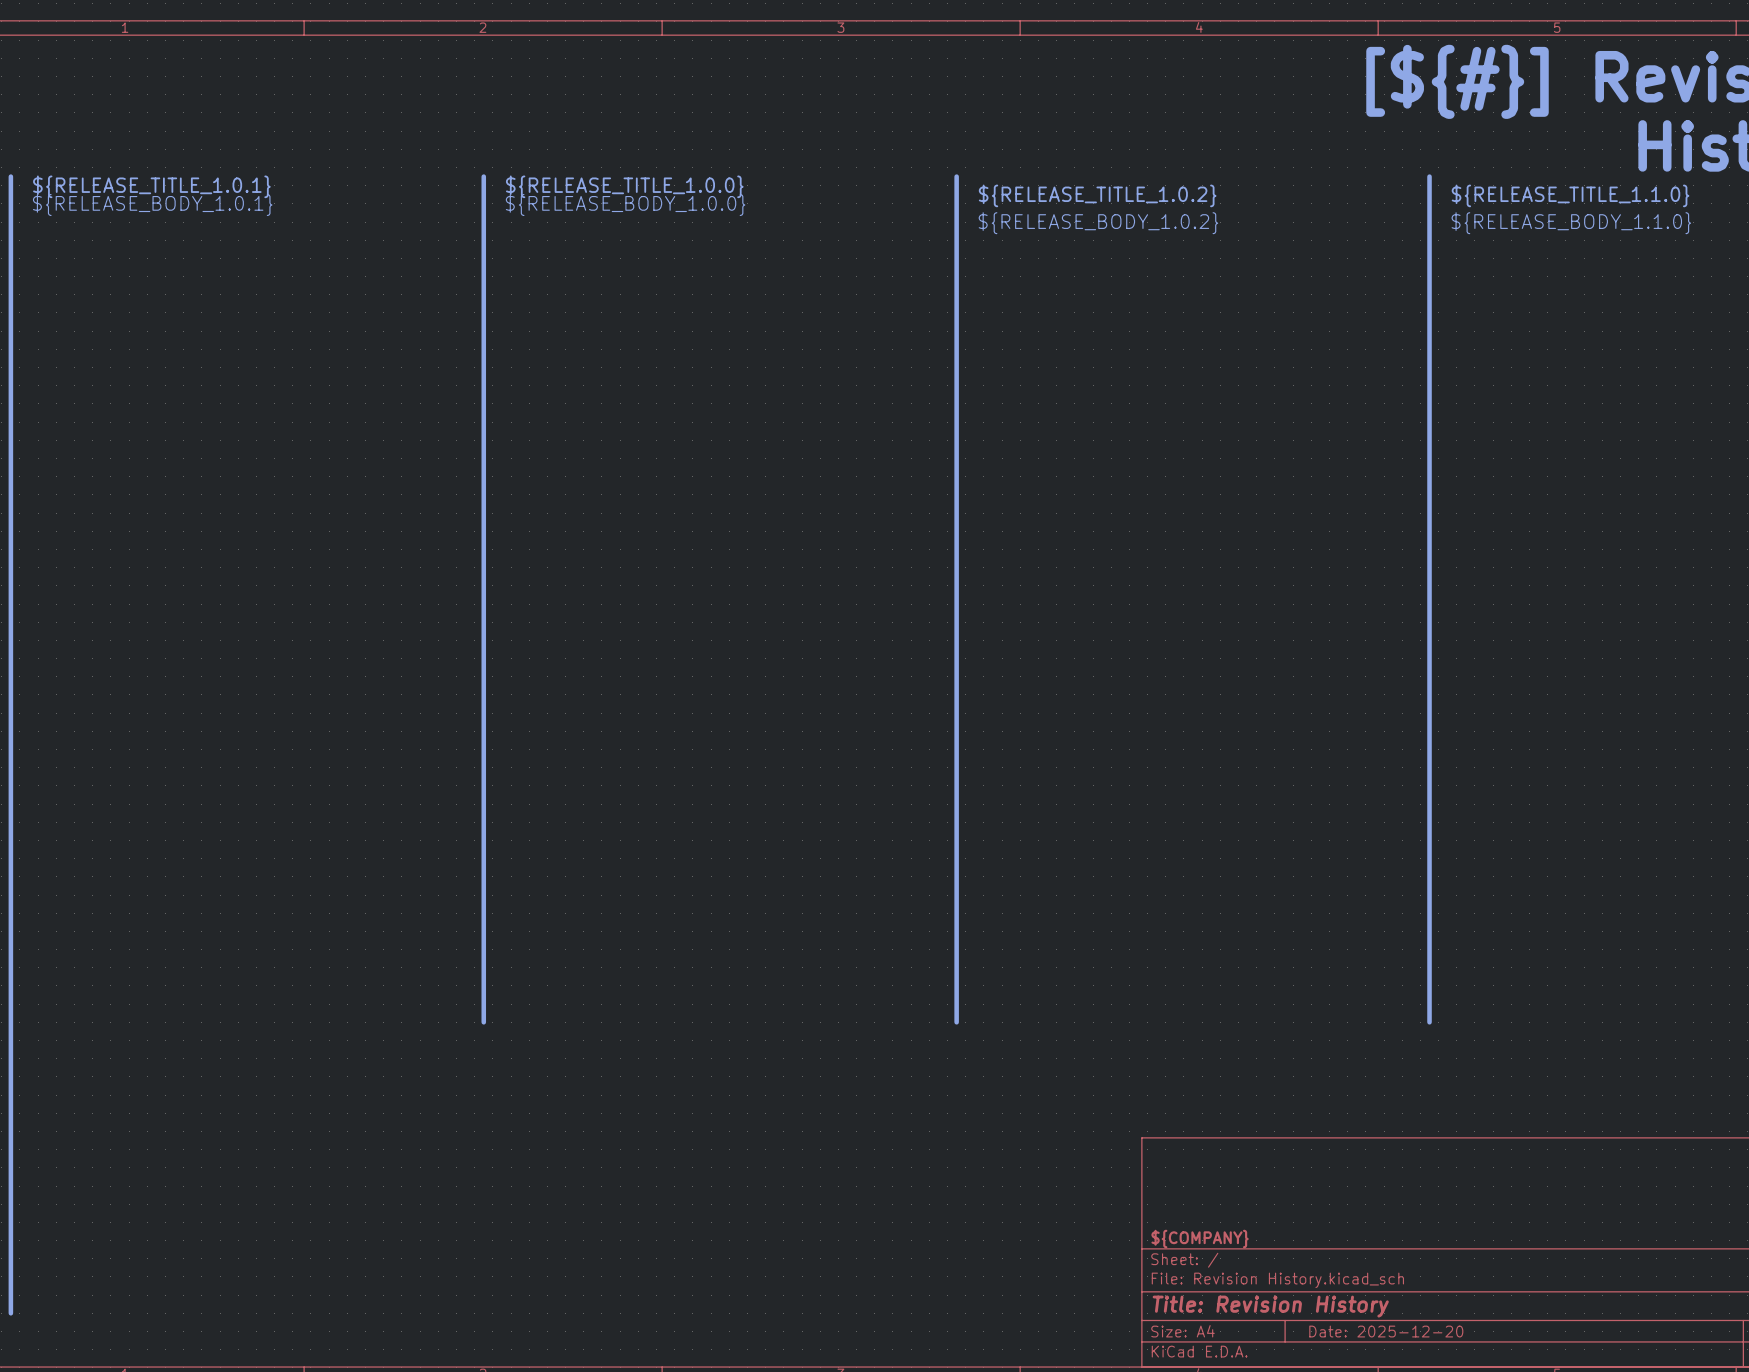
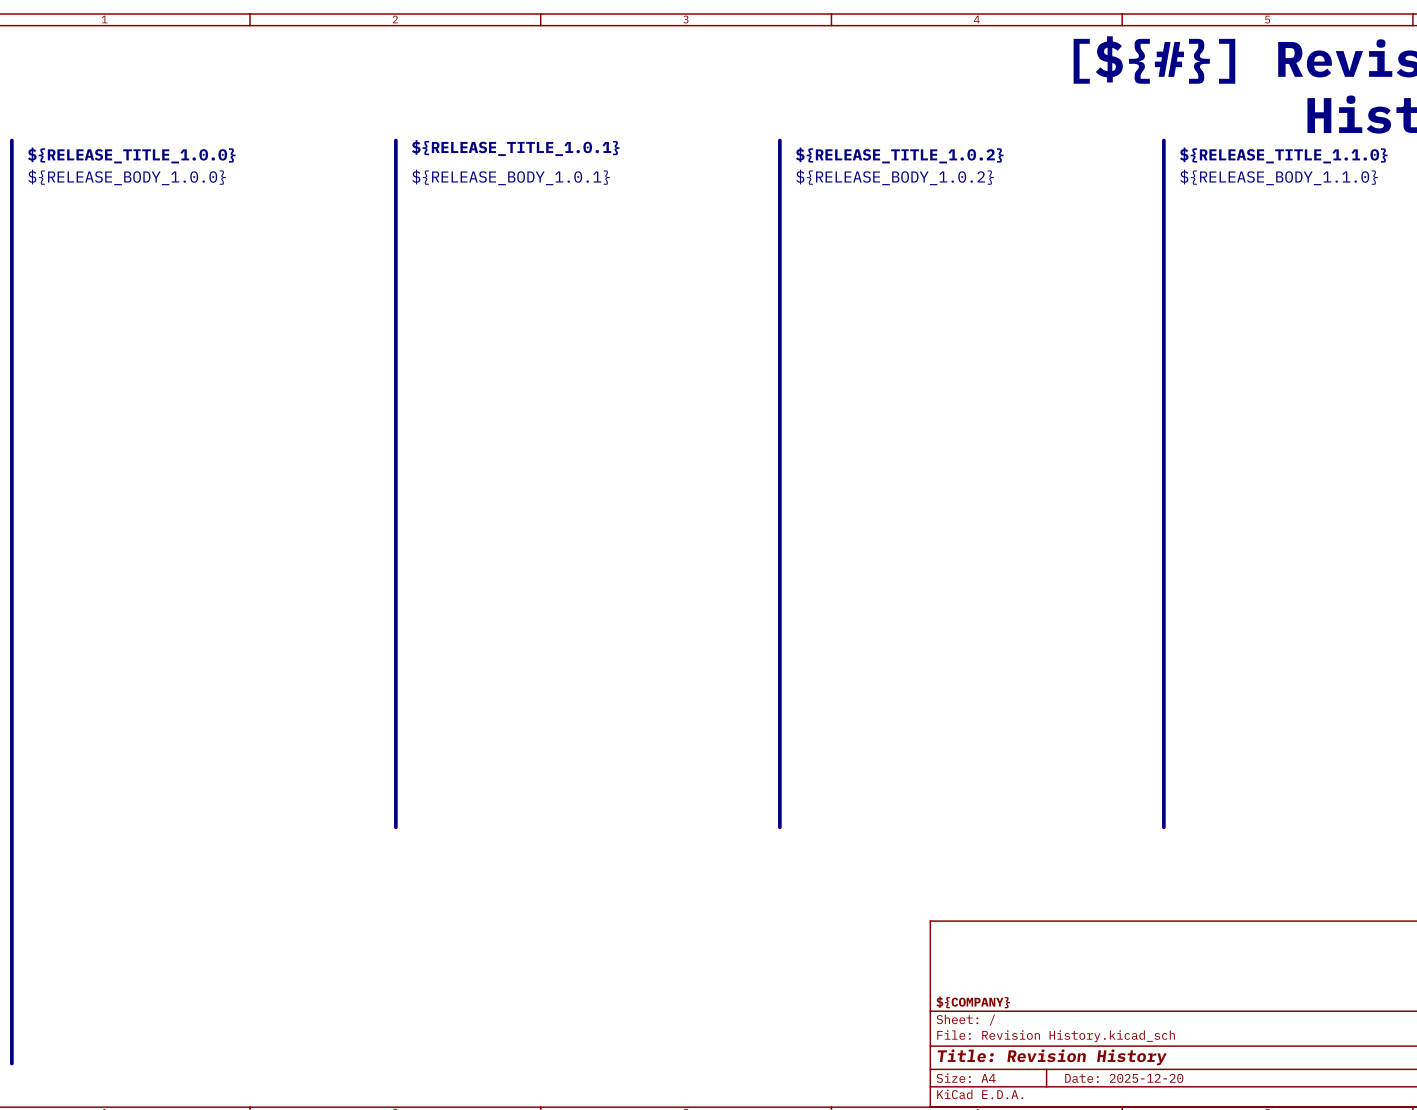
text: ${RELEASE_TITLE_1.0.1} (151, 186) -> none
text: ${RELEASE_TITLE_1.0.0} (624, 186) -> ${RELEASE_TITLE_1.0.1} (515, 148)
text: none -> ${RELEASE_TITLE_1.0.0} (131, 155)
text: ${RELEASE_BODY_1.0.1} (152, 205) -> none
text: ${RELEASE_BODY_1.0.0} (625, 205) -> ${RELEASE_BODY_1.0.1} (511, 177)
text: none -> ${RELEASE_BODY_1.0.0} (127, 177)

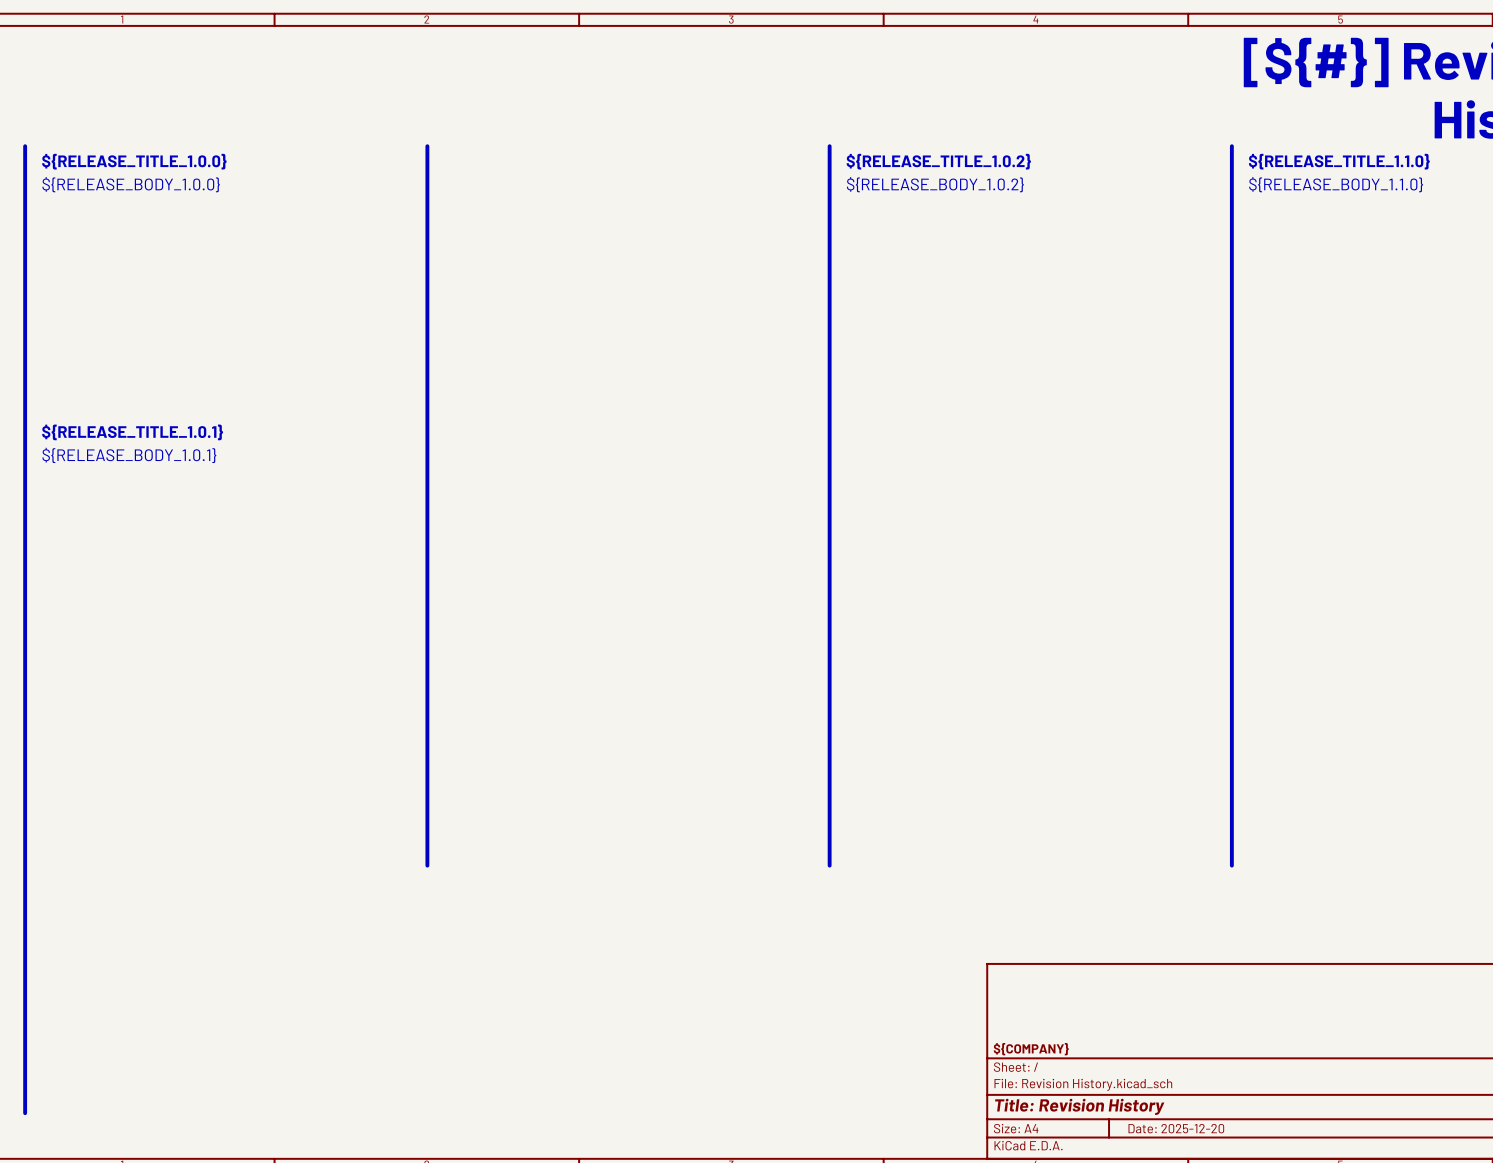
text: ${RELEASE_TITLE_1.0.1} (515, 148) -> none
text: ${RELEASE_BODY_1.0.1} (511, 177) -> none
text: none -> ${RELEASE_TITLE_1.0.1} (132, 432)
text: none -> ${RELEASE_BODY_1.0.1} (129, 455)

